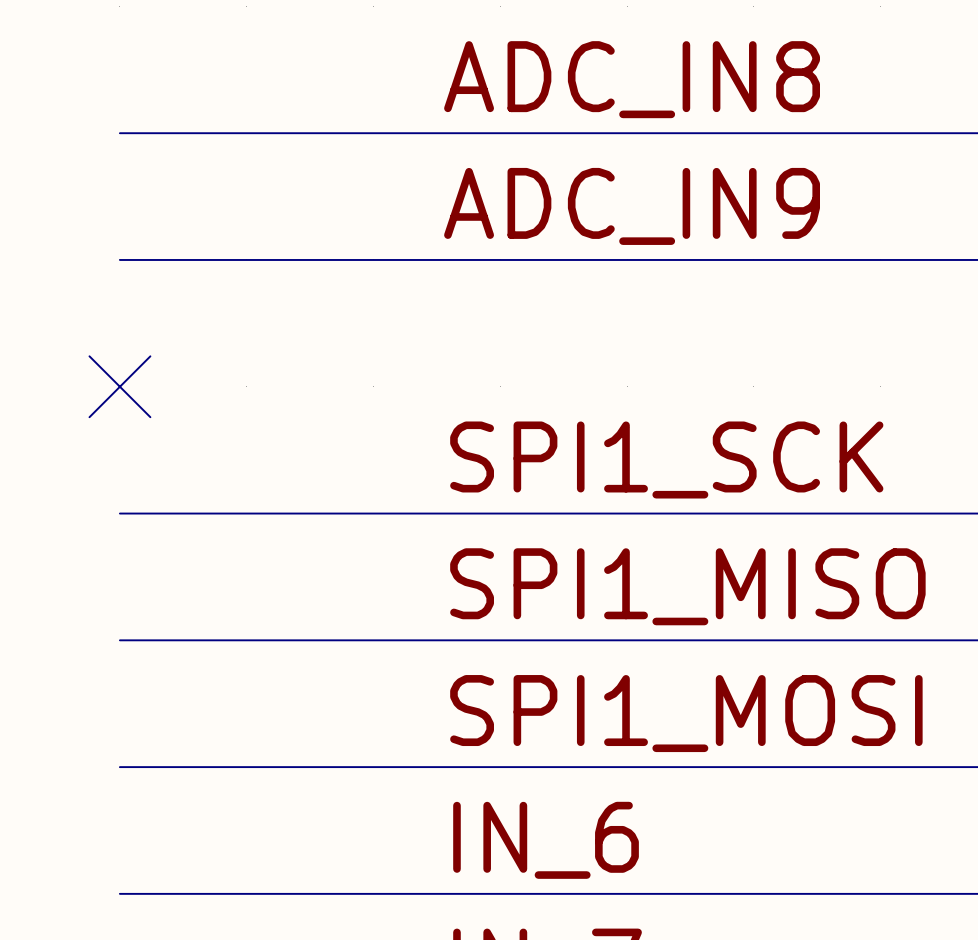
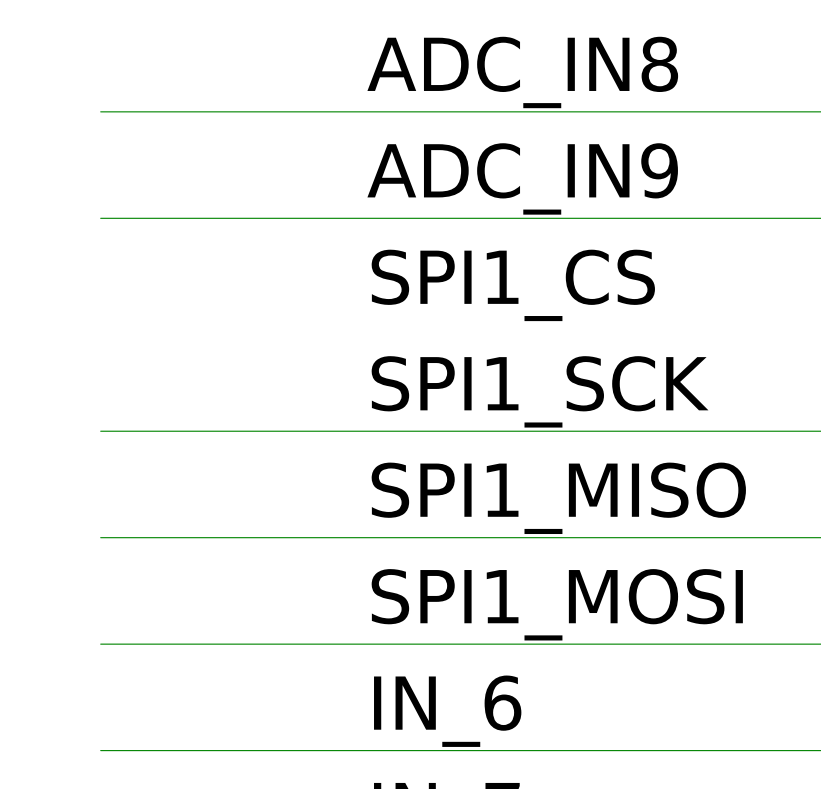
label: none -> SPI1_CS (513, 285)
no-connect mark: (119, 386) -> none

